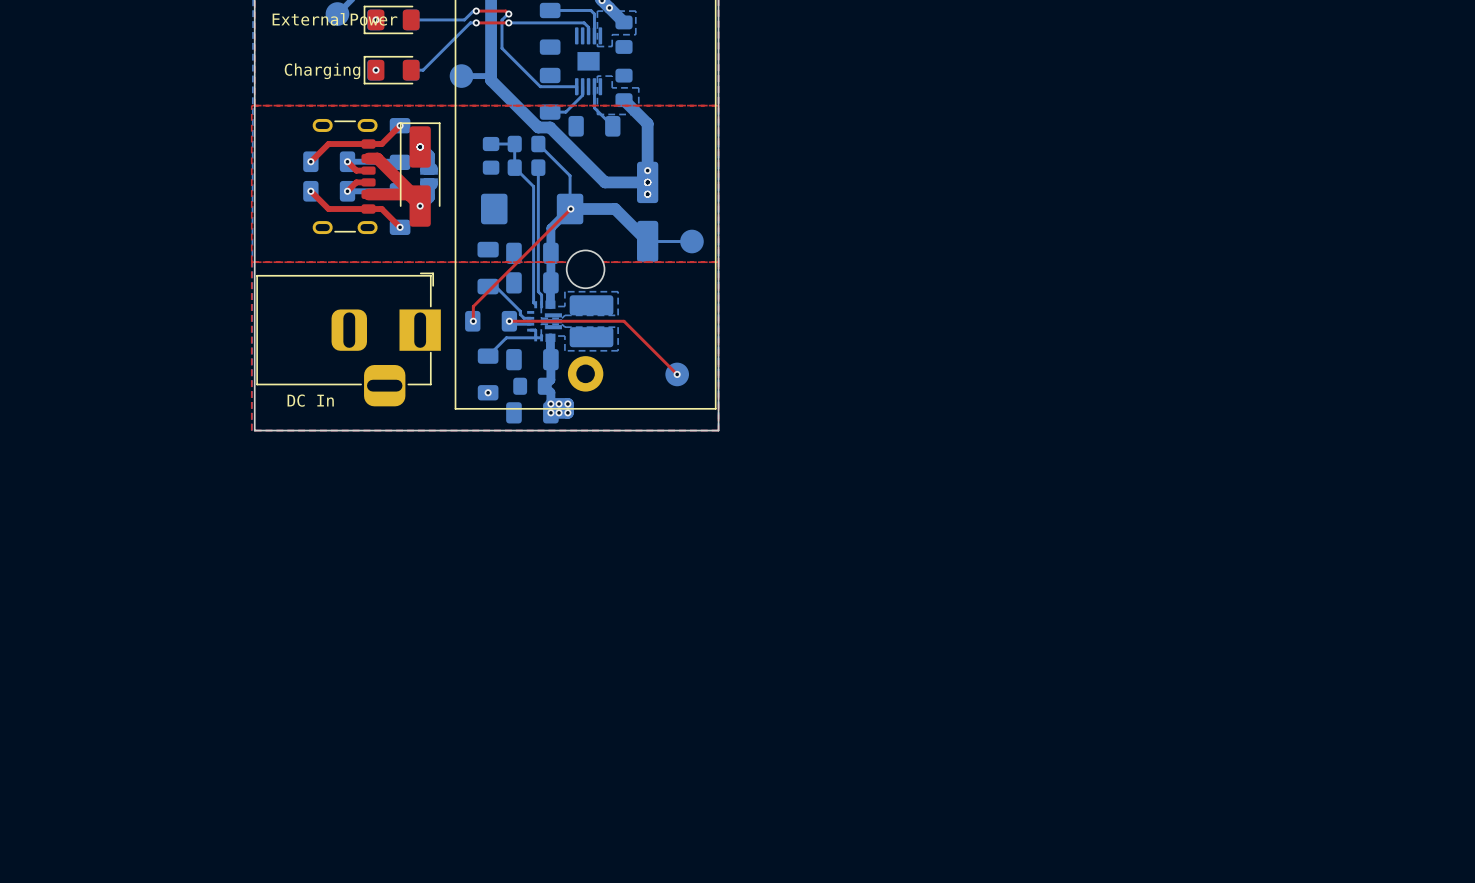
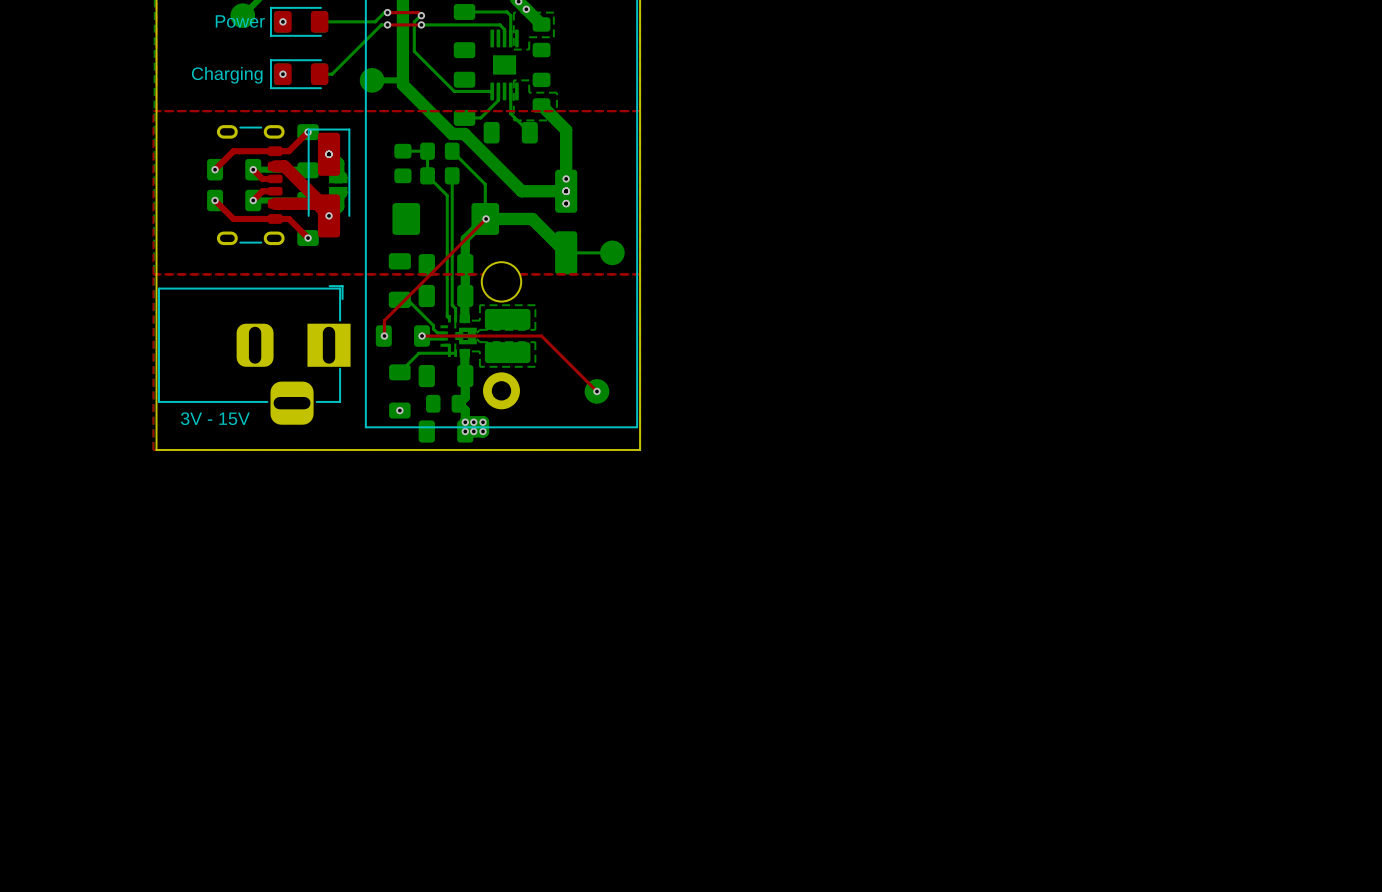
part value: ExternalPower (334, 19) -> Power (240, 21)
part value: DC In (310, 400) -> 3V - 15V (215, 418)

